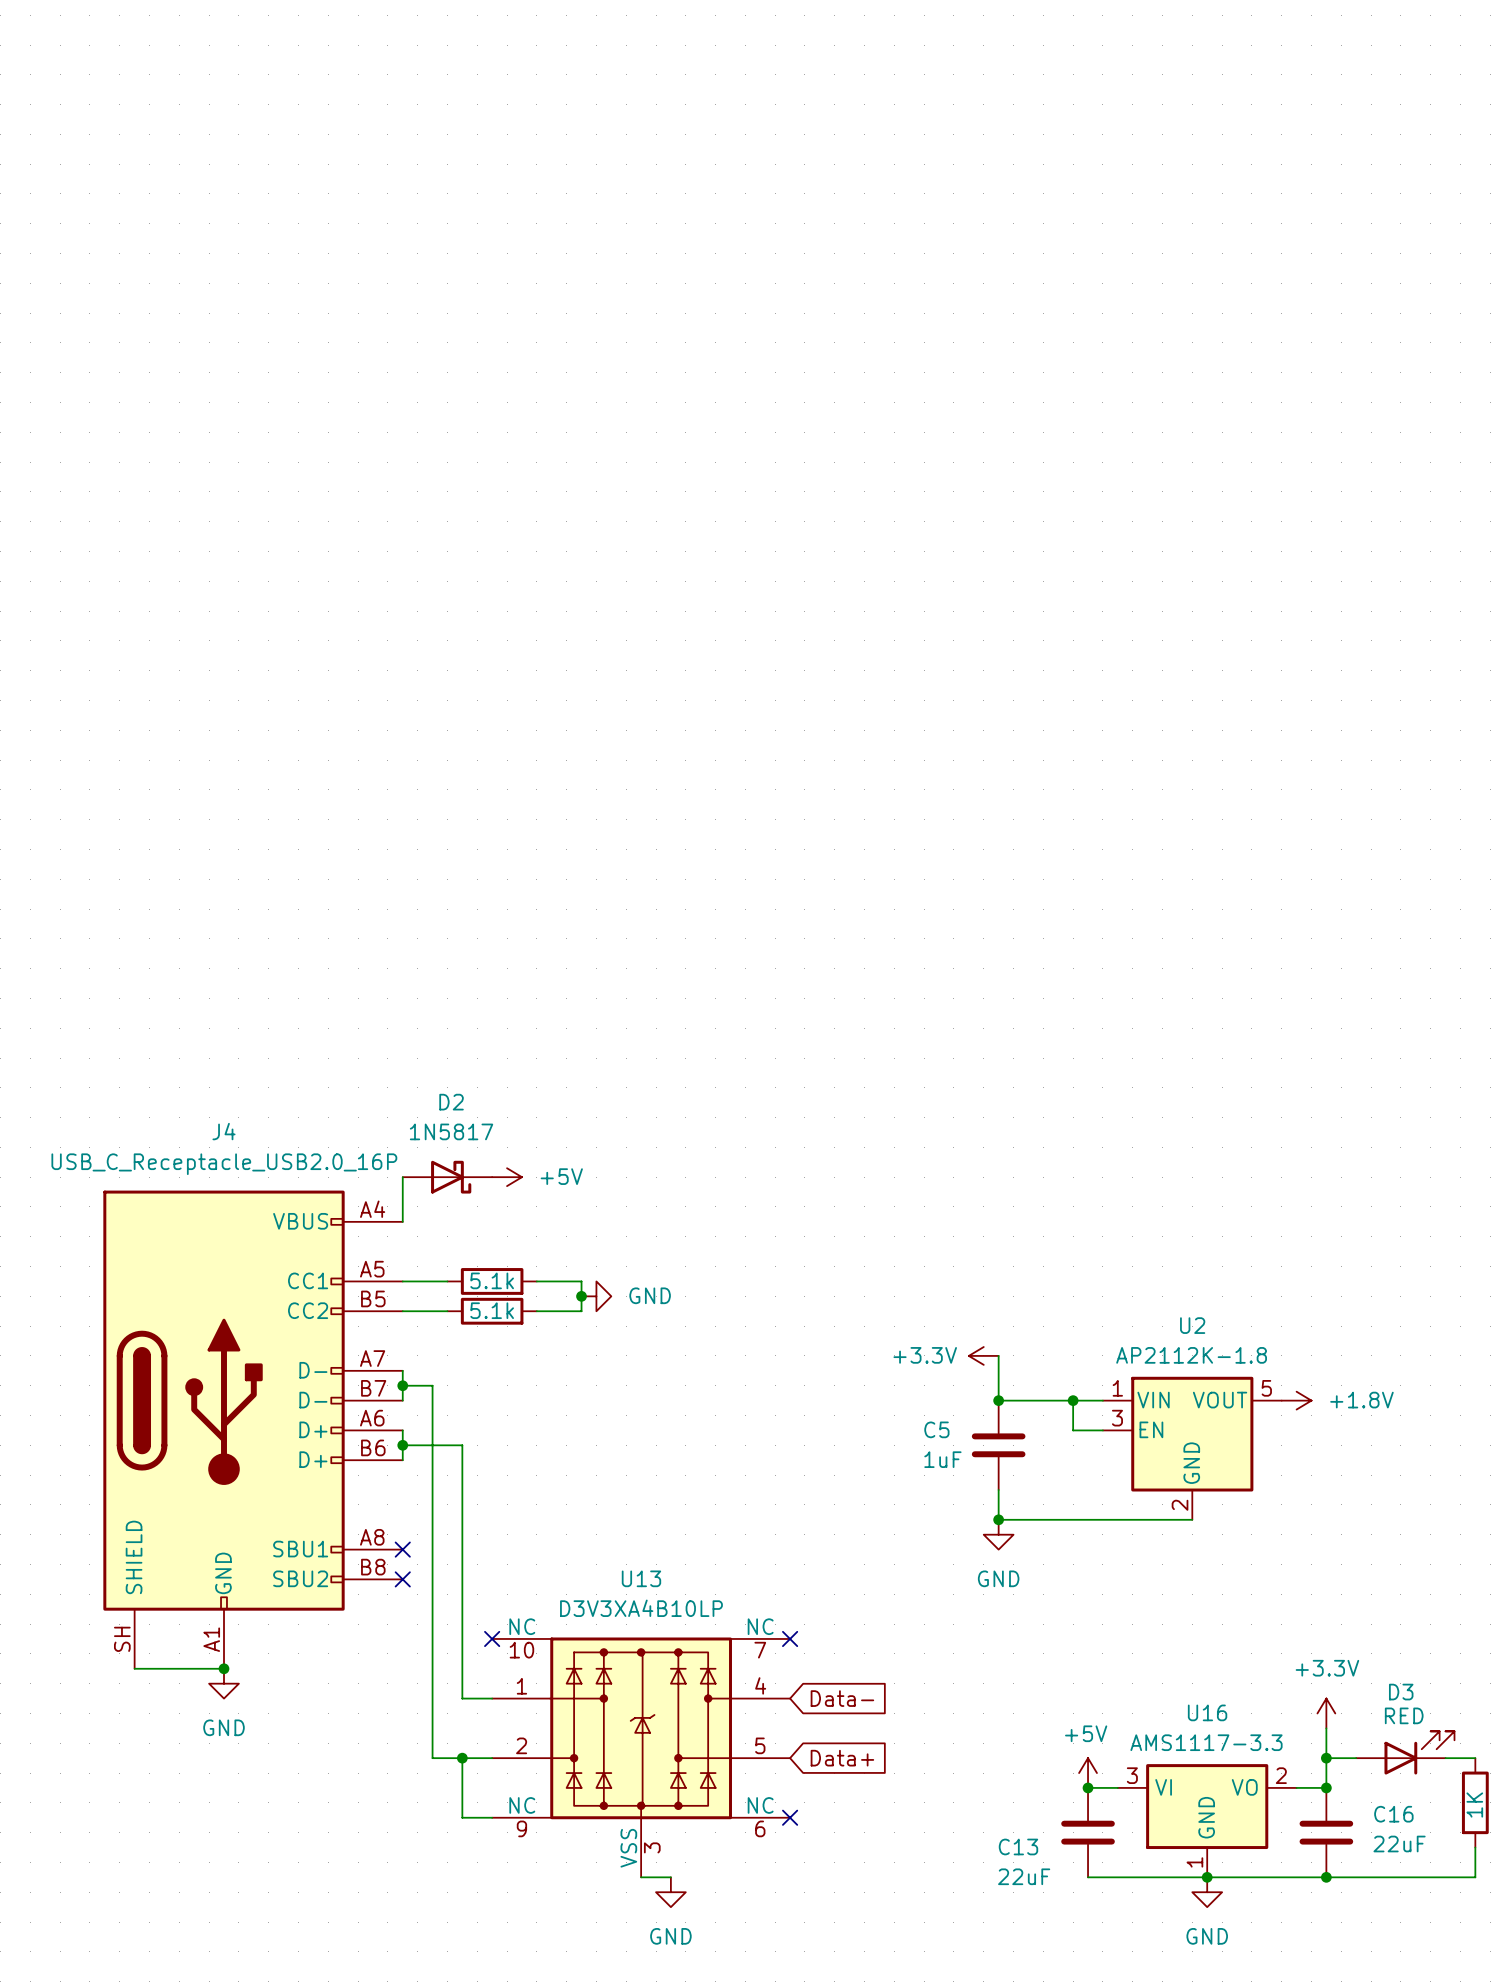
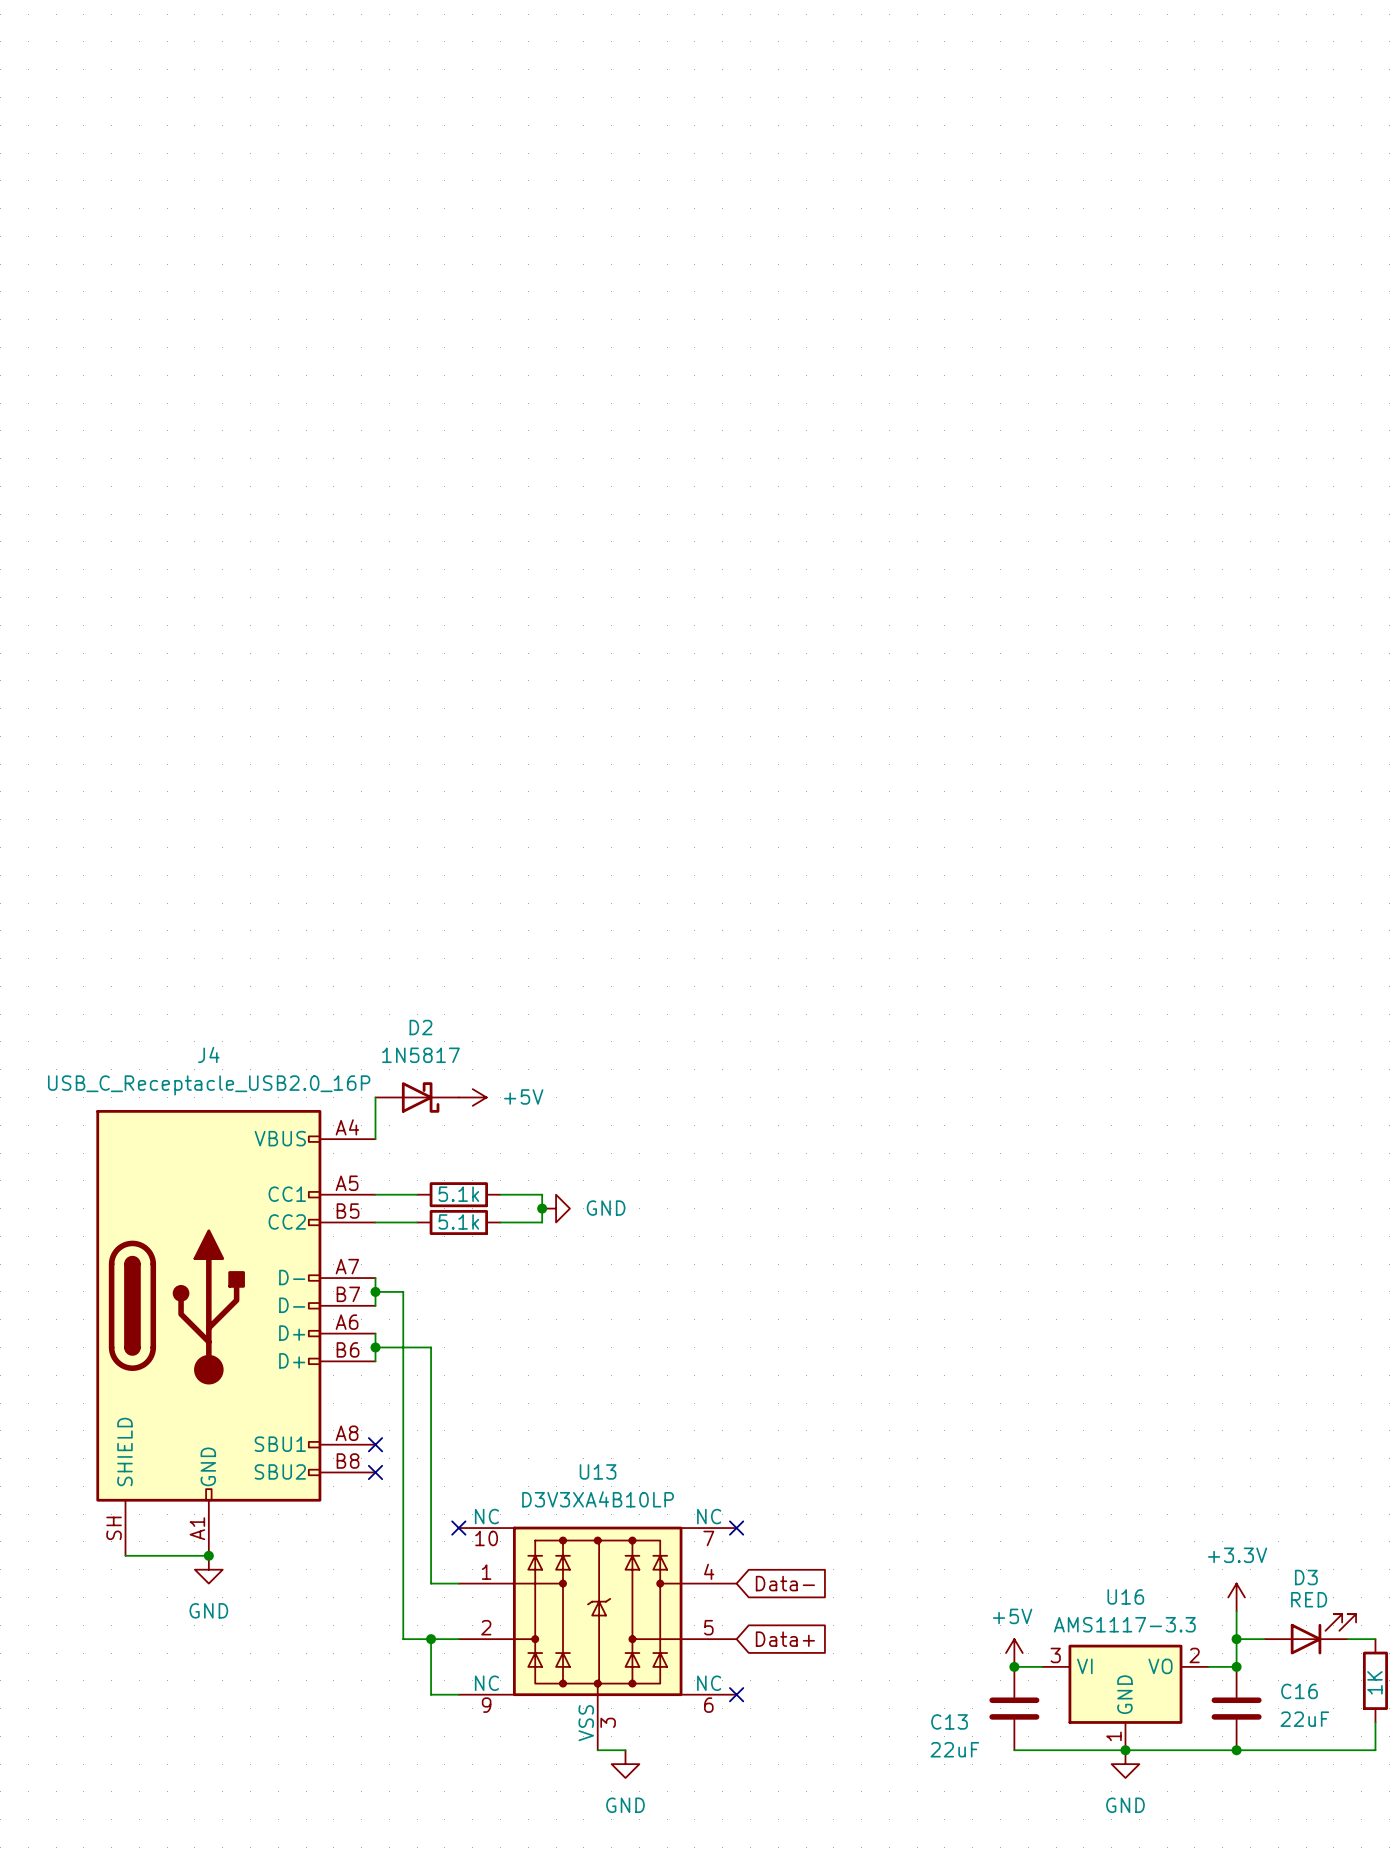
power symbol: +3.3V (983, 1355) -> none
wire: (998, 1355) (998, 1400) (1102, 1400) -> none
junction: (998, 1400) -> none
wire: (1073, 1400) (1073, 1430) (1102, 1430) -> none
junction: (1073, 1400) -> none
power symbol: +1.8V (1296, 1400) -> none
C5: 1uF (998, 1445) -> none
U2: AP2112K-1.8 (1192, 1448) -> none
wire: (998, 1490) (998, 1519) (1192, 1519) -> none
junction: (998, 1519) -> none
power symbol: GND (998, 1534) -> none

